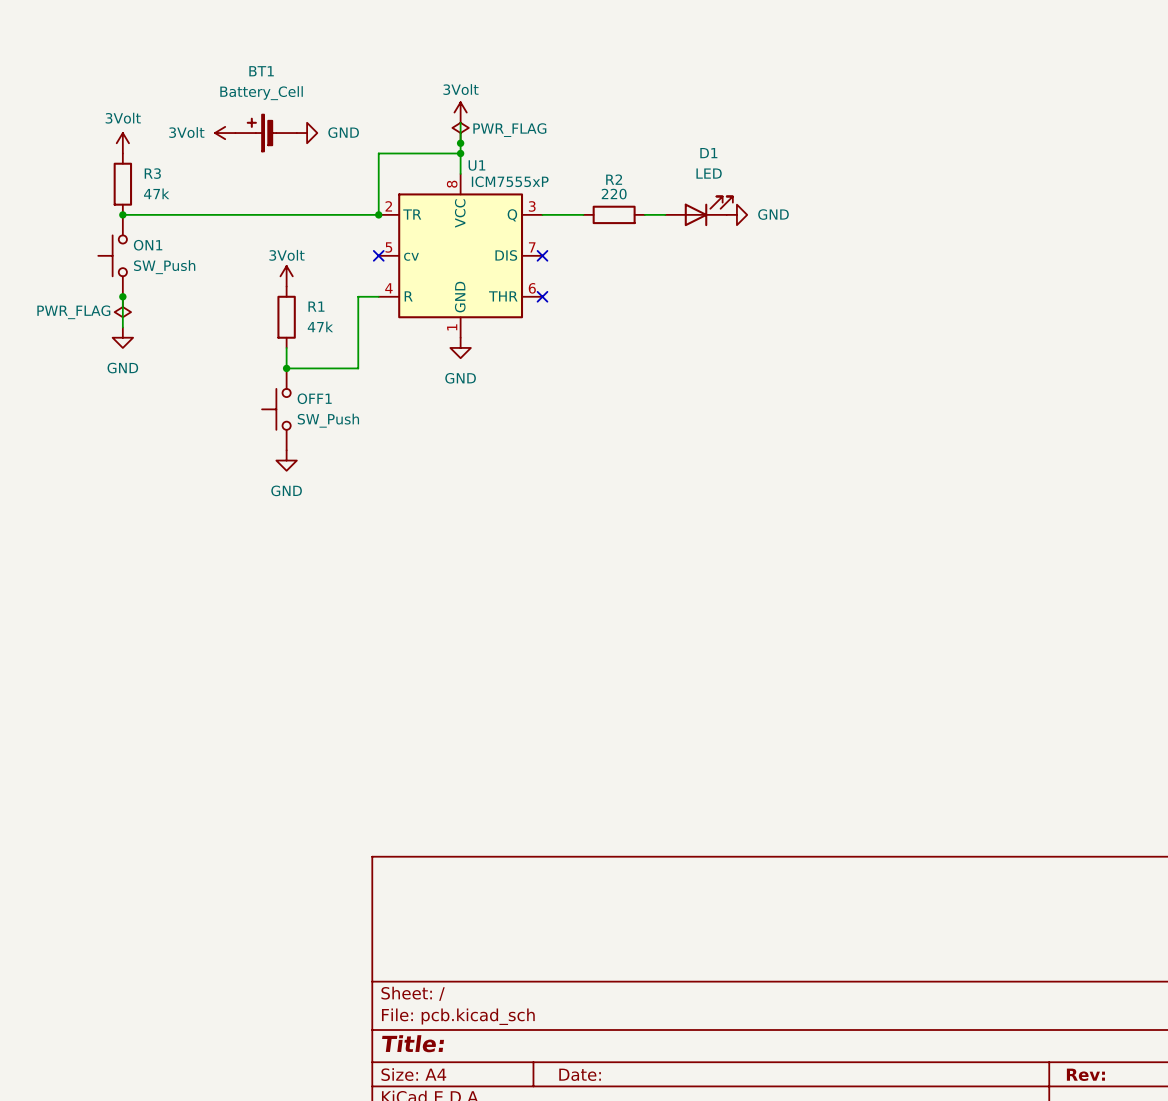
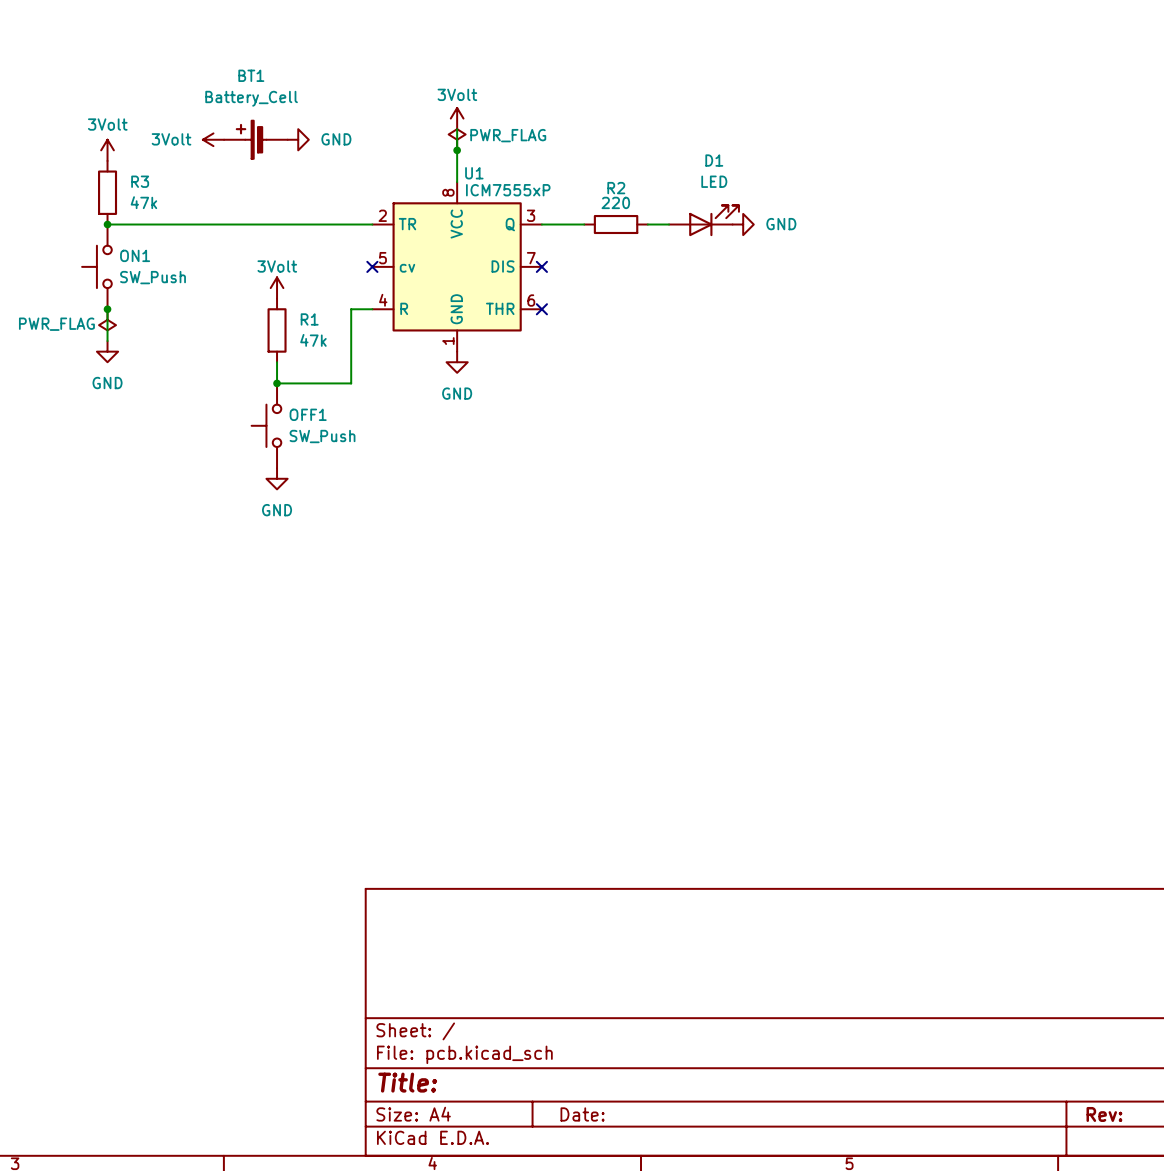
wire: (460, 153) (378, 153) (378, 214) -> none
junction: (460, 153) -> none
junction: (378, 214) -> none

